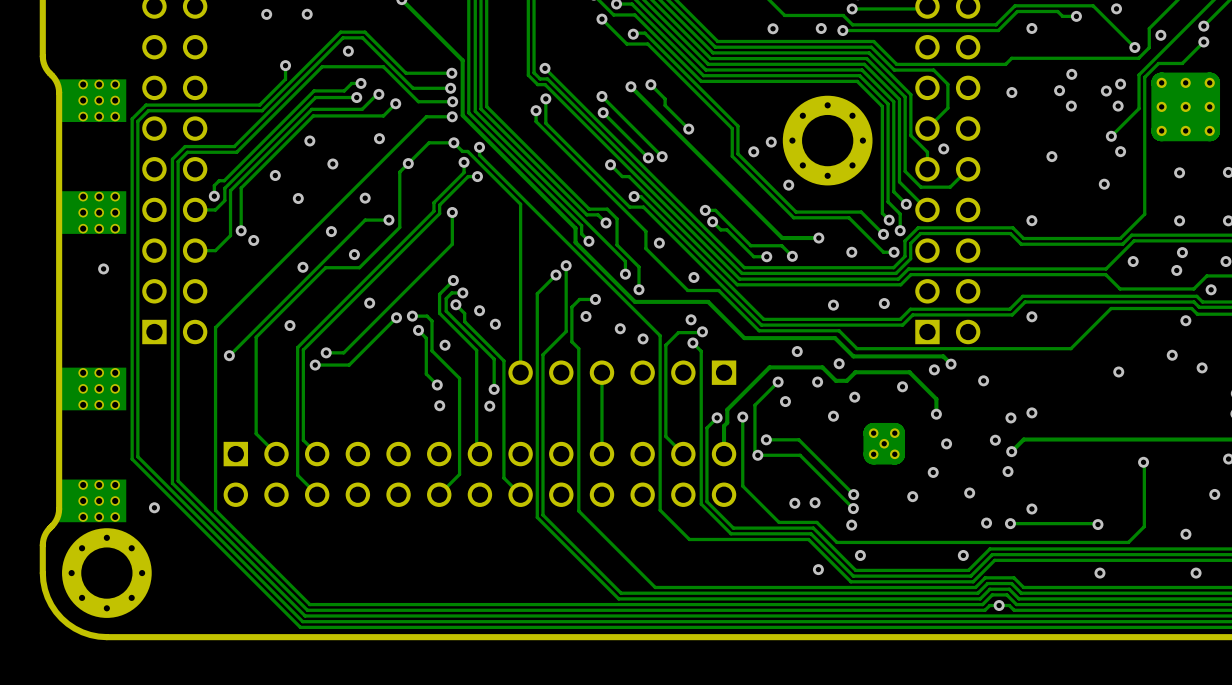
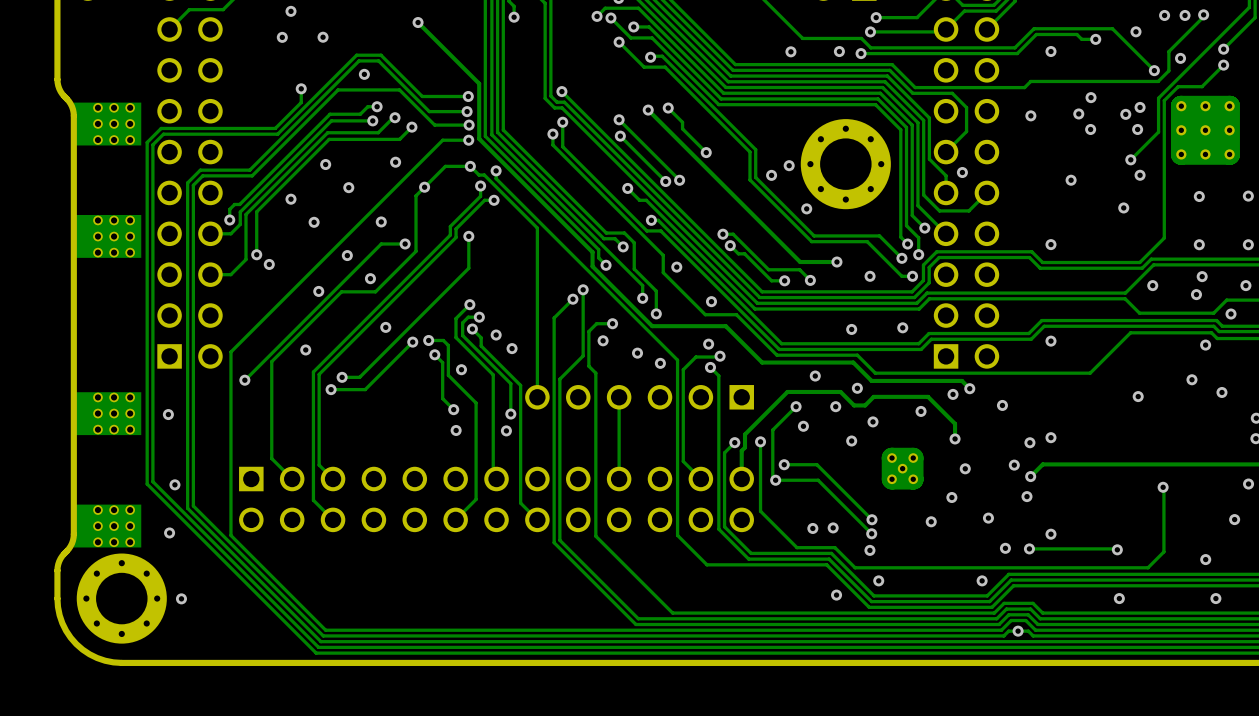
via: (103, 268) -> none
via: none -> (168, 414)
via: none -> (174, 484)
via: none -> (181, 598)

